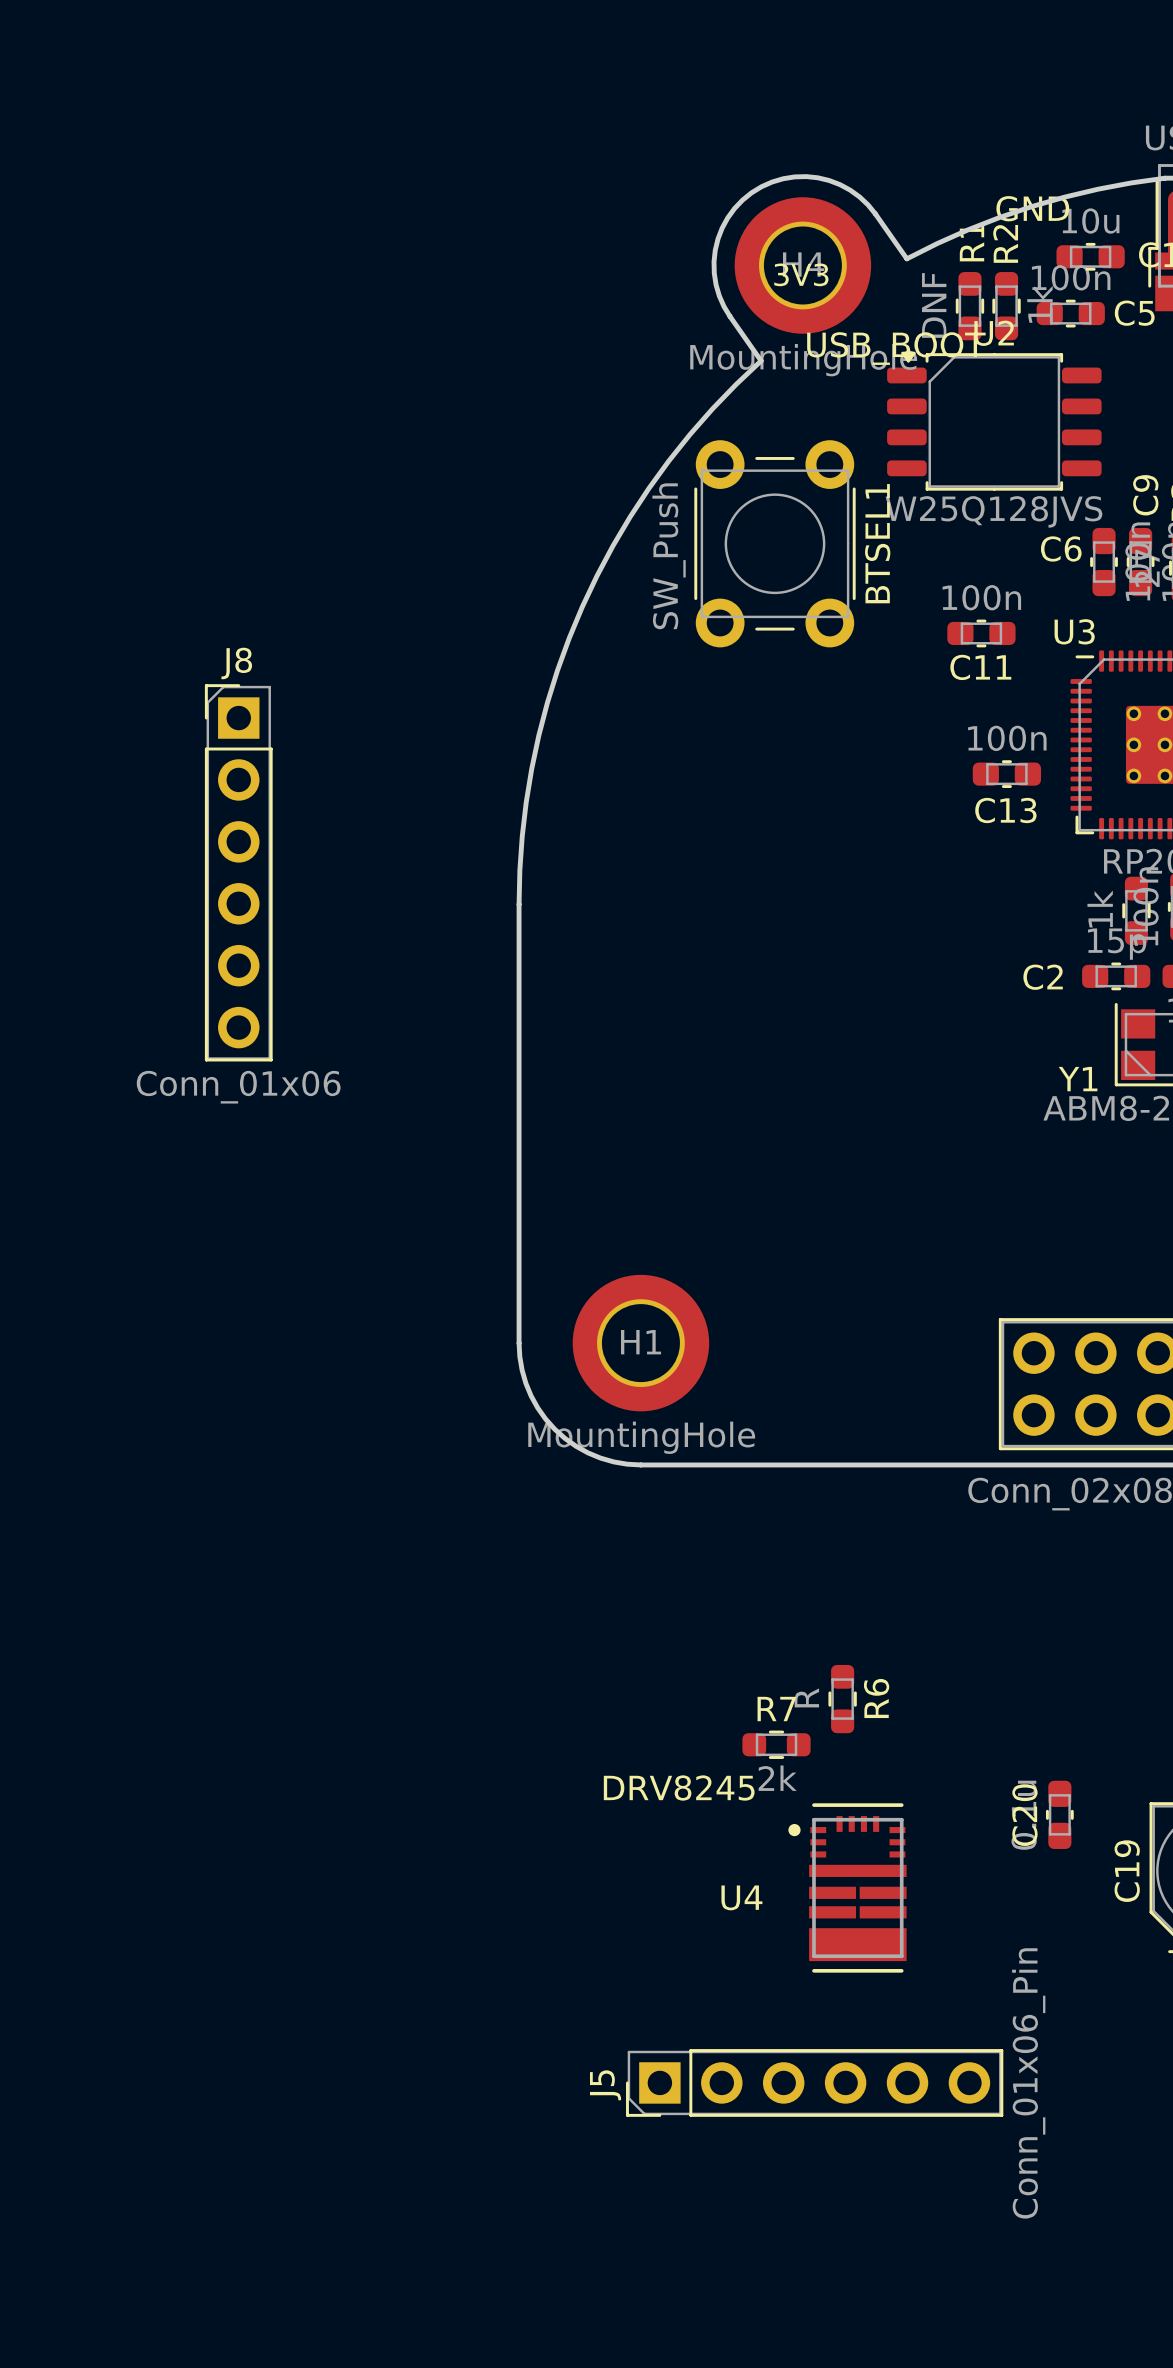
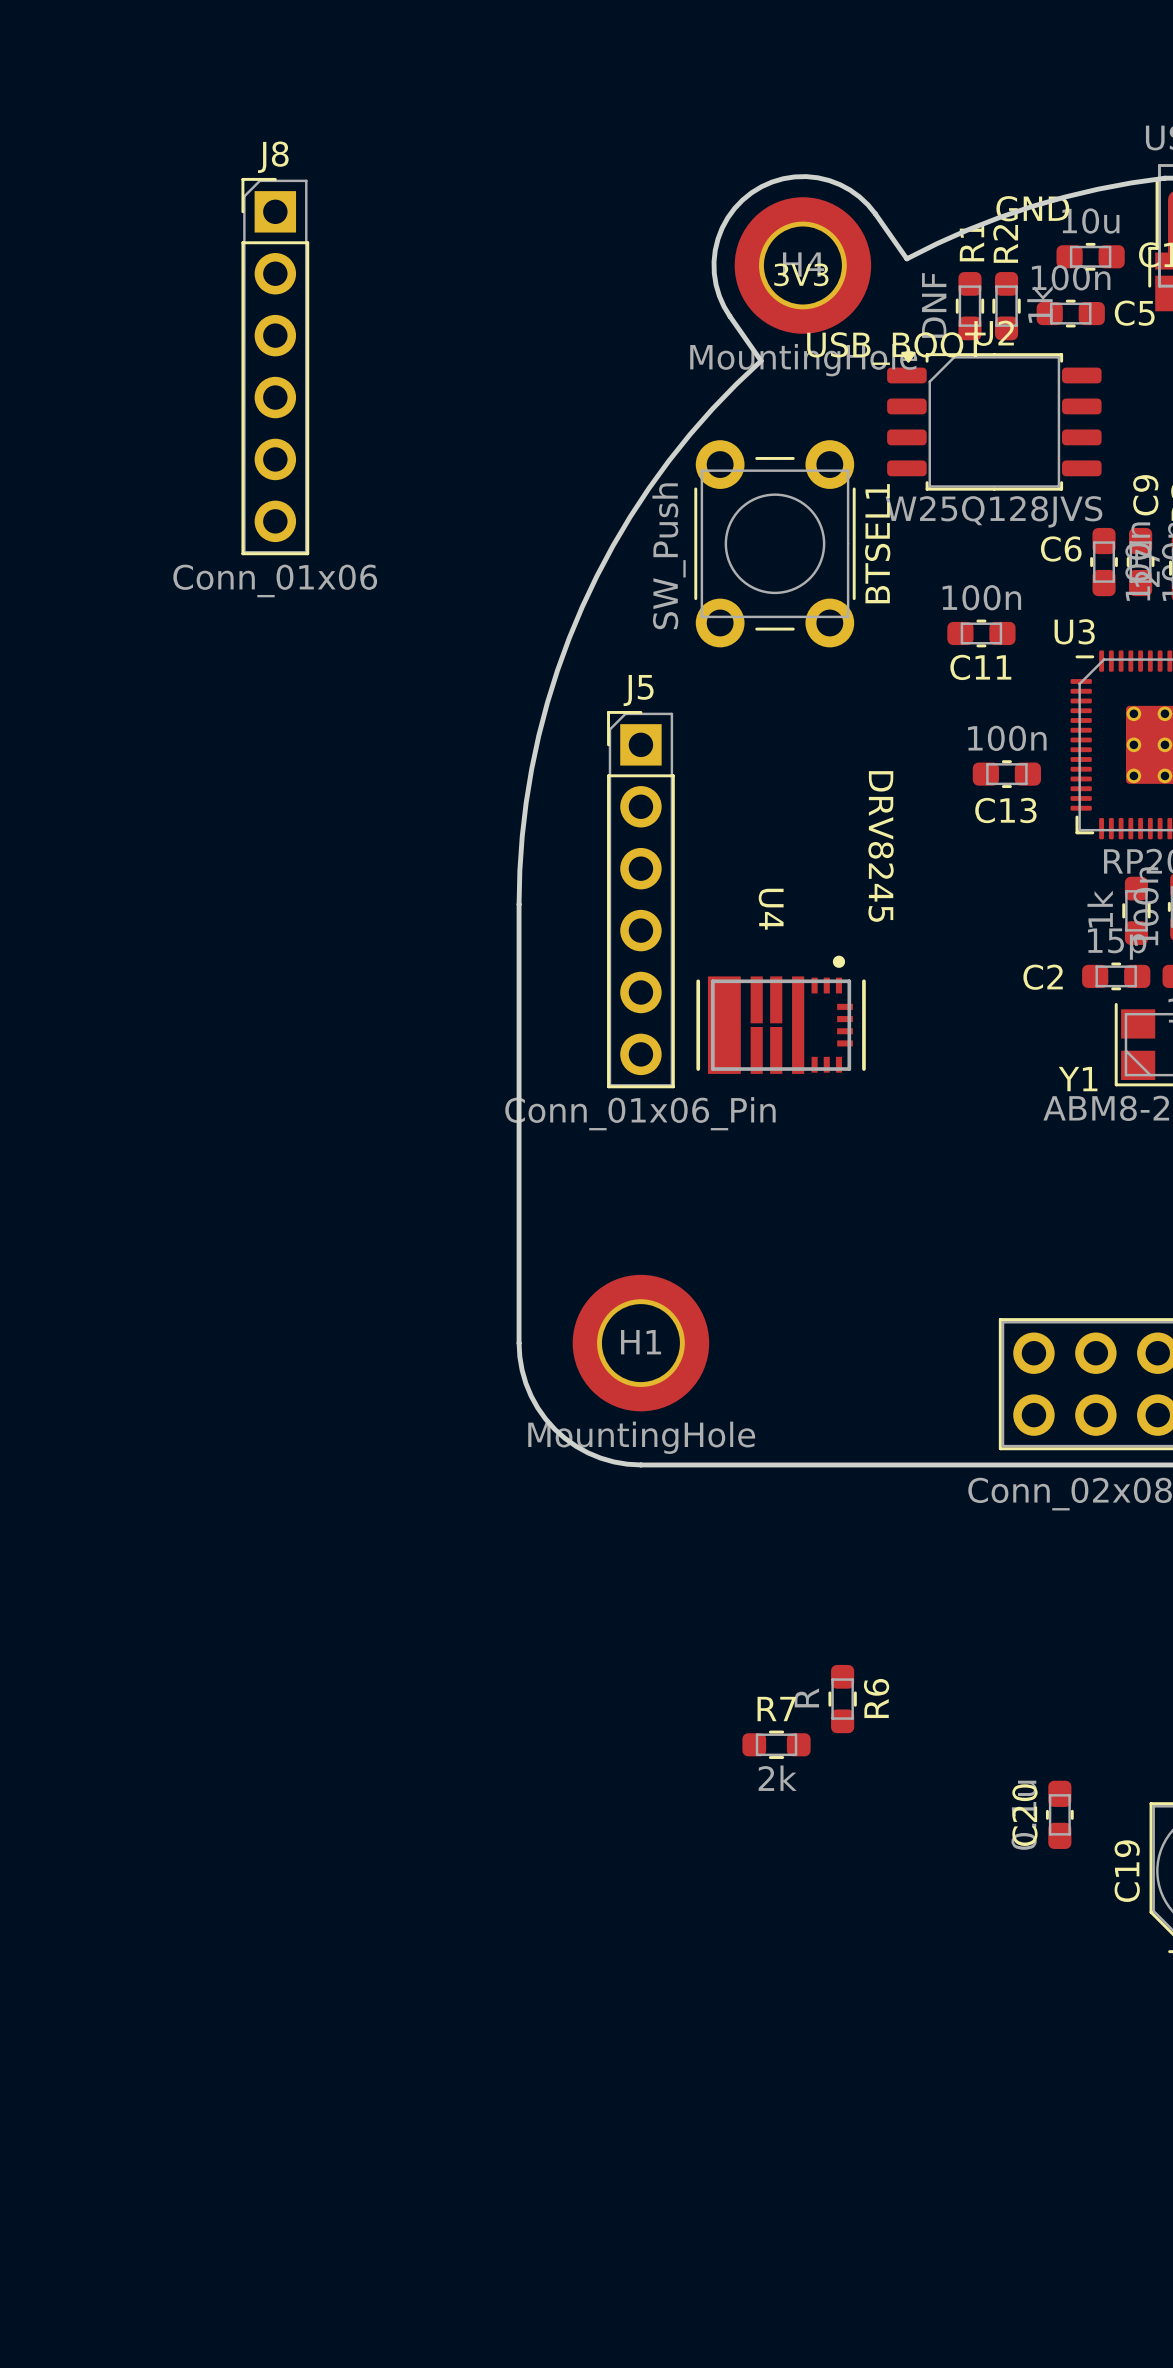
J8 position: (238, 872) -> (275, 366)
U4 rotation: 0° (847, 1887) -> 90° clockwise (781, 1014)
U4 position: (847, 1887) -> (781, 1014)
J5 rotation: 0° (814, 2082) -> 90° clockwise (640, 899)
J5 position: (814, 2082) -> (640, 899)

